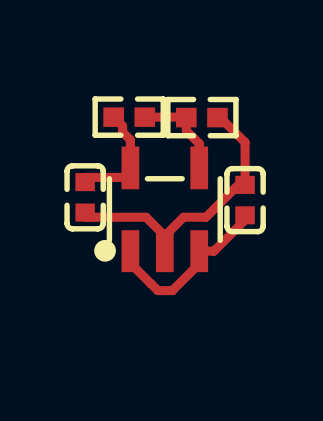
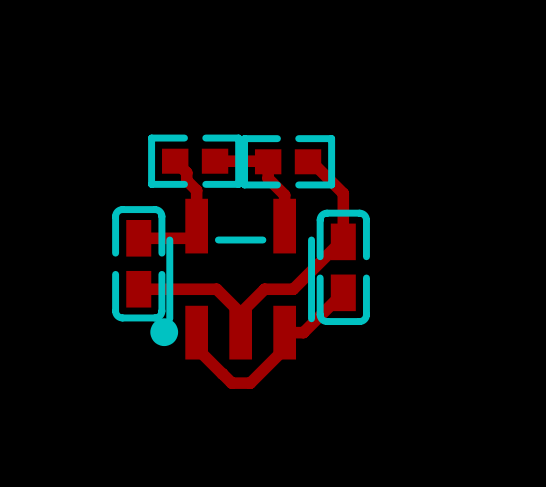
part footprint: [64, 163, 106, 232] -> [112, 206, 166, 322]
part footprint: [224, 165, 266, 235] -> [316, 209, 370, 326]

